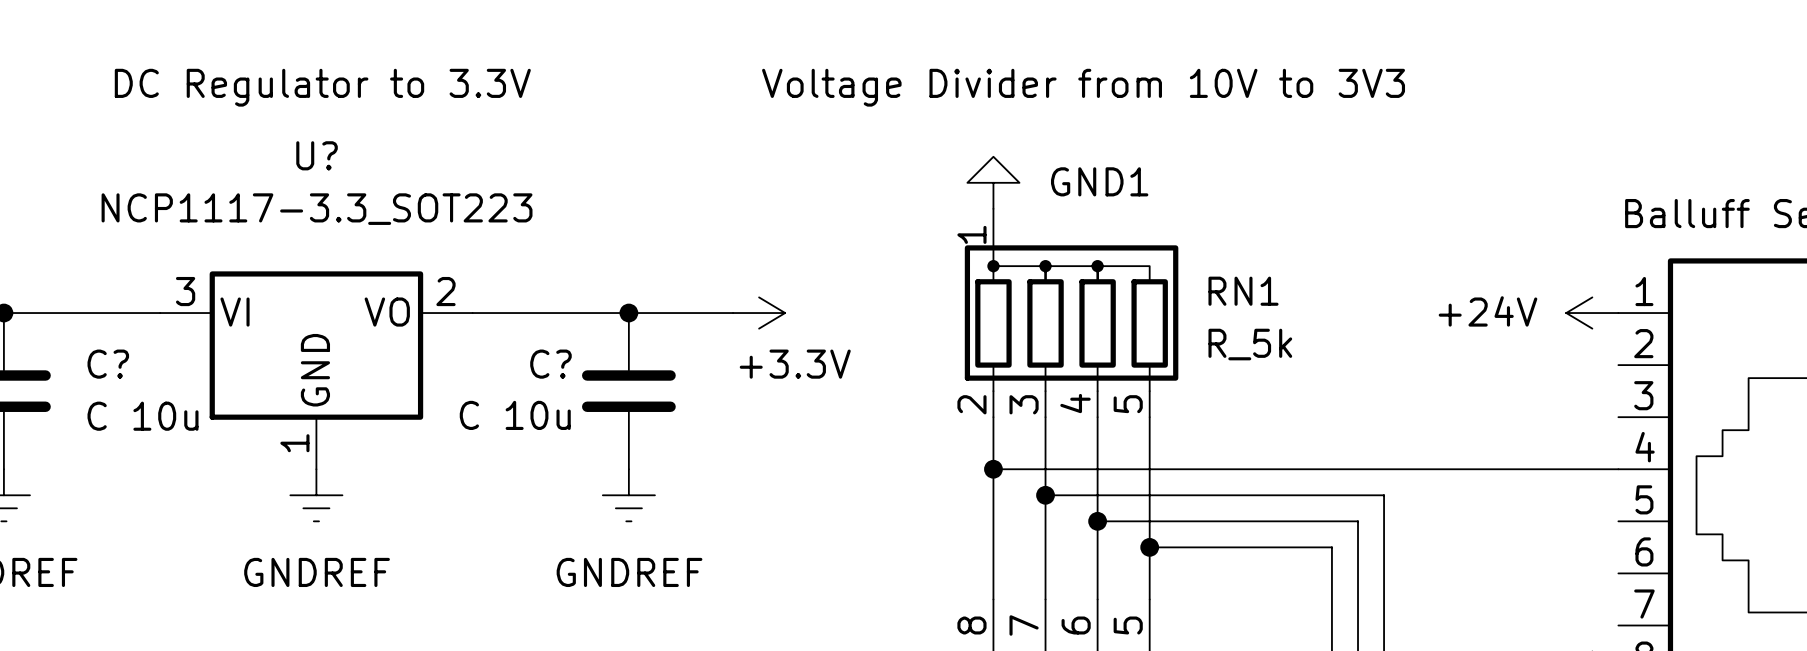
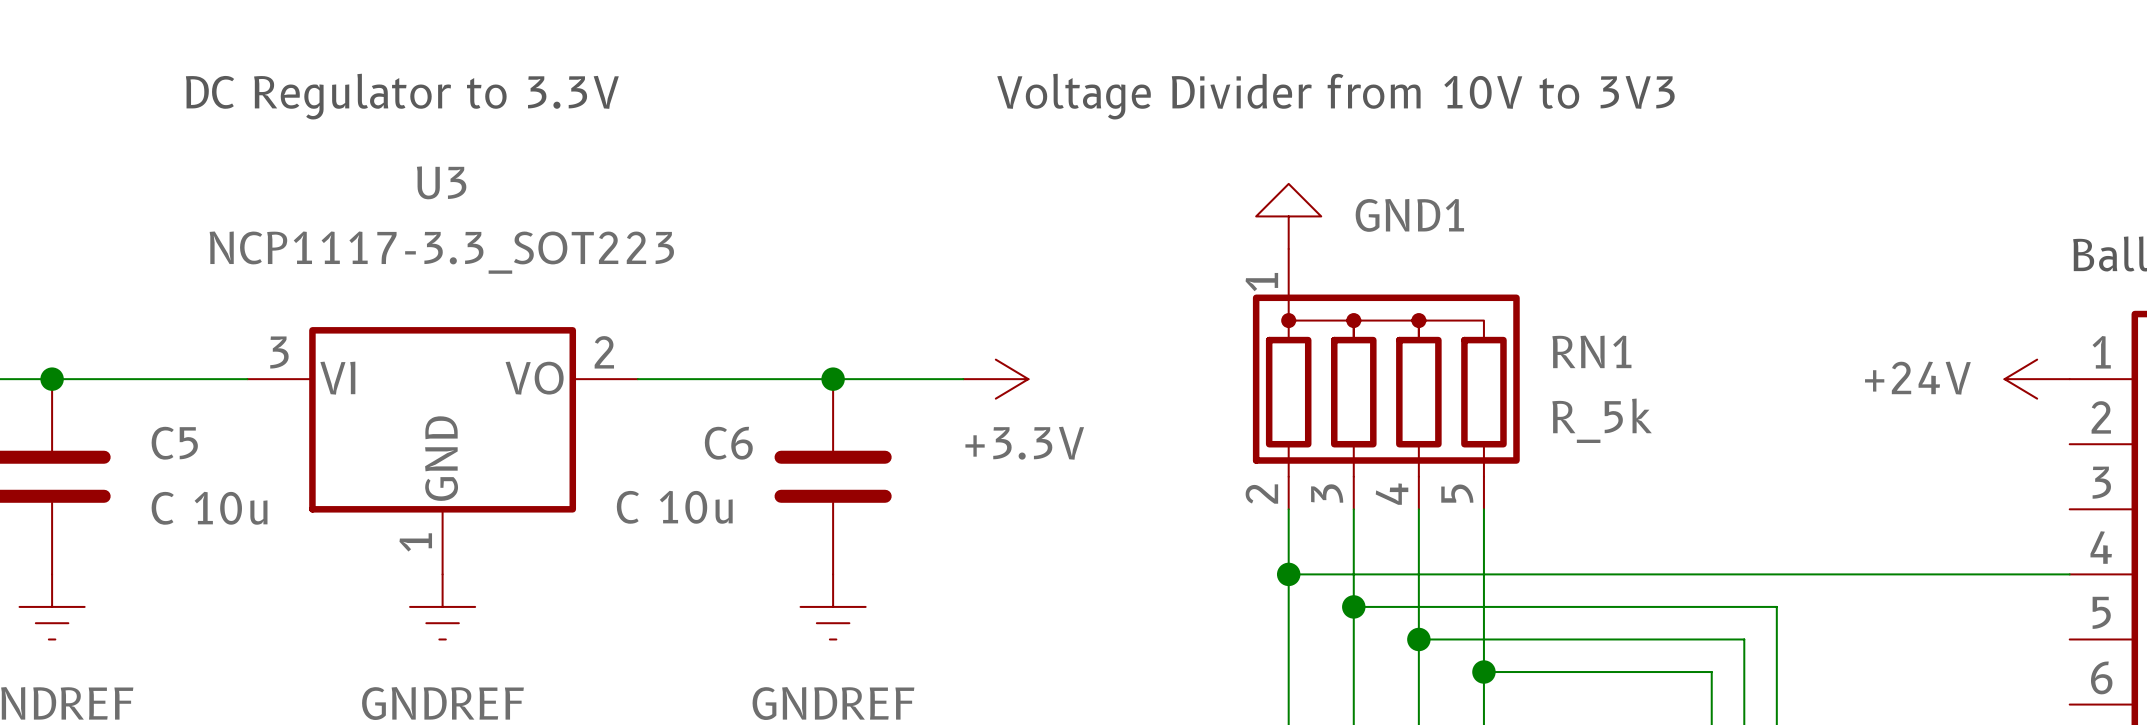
U? name: U? (317, 155) -> U3 (441, 182)
C? name: C? (108, 364) -> C5 (174, 443)
C? name: C? (550, 364) -> C6 (728, 443)

